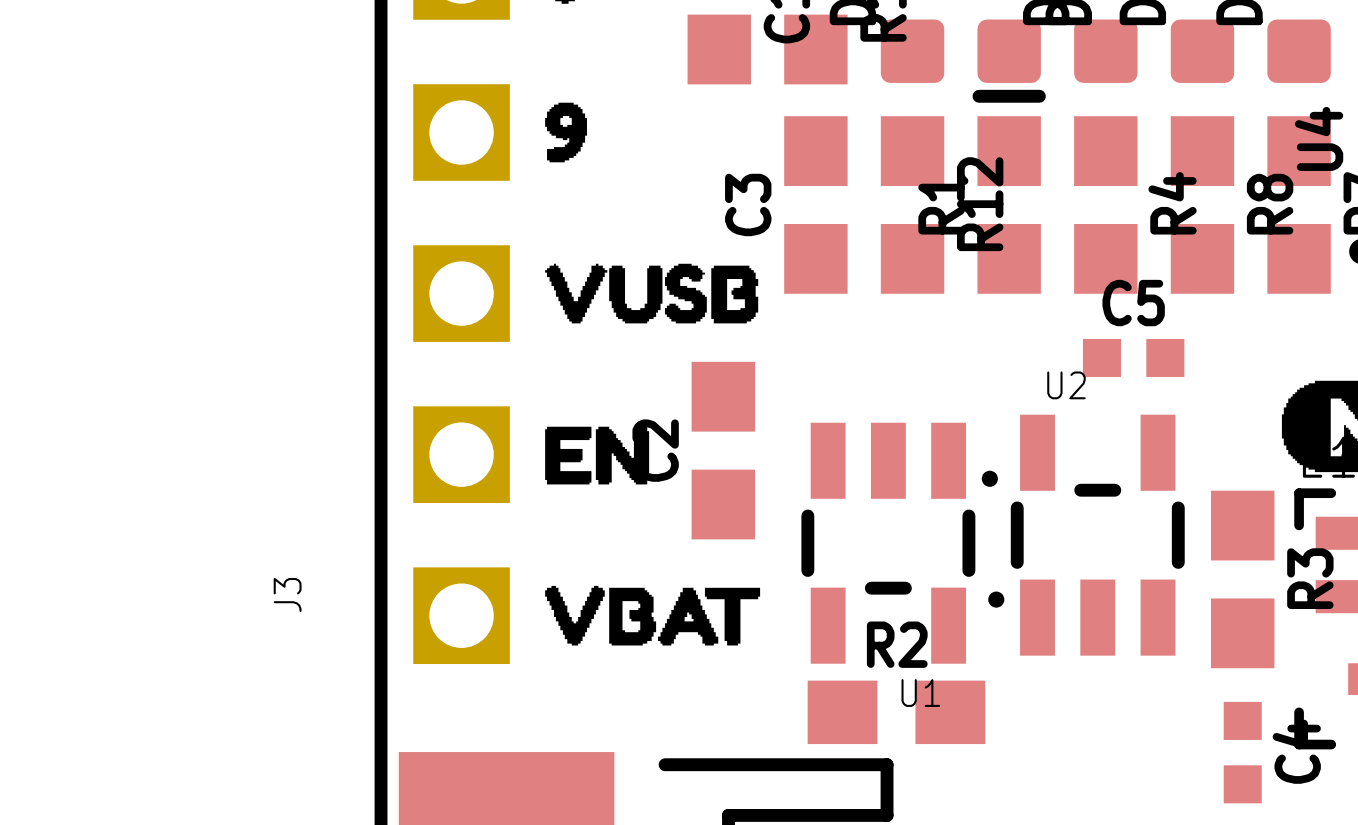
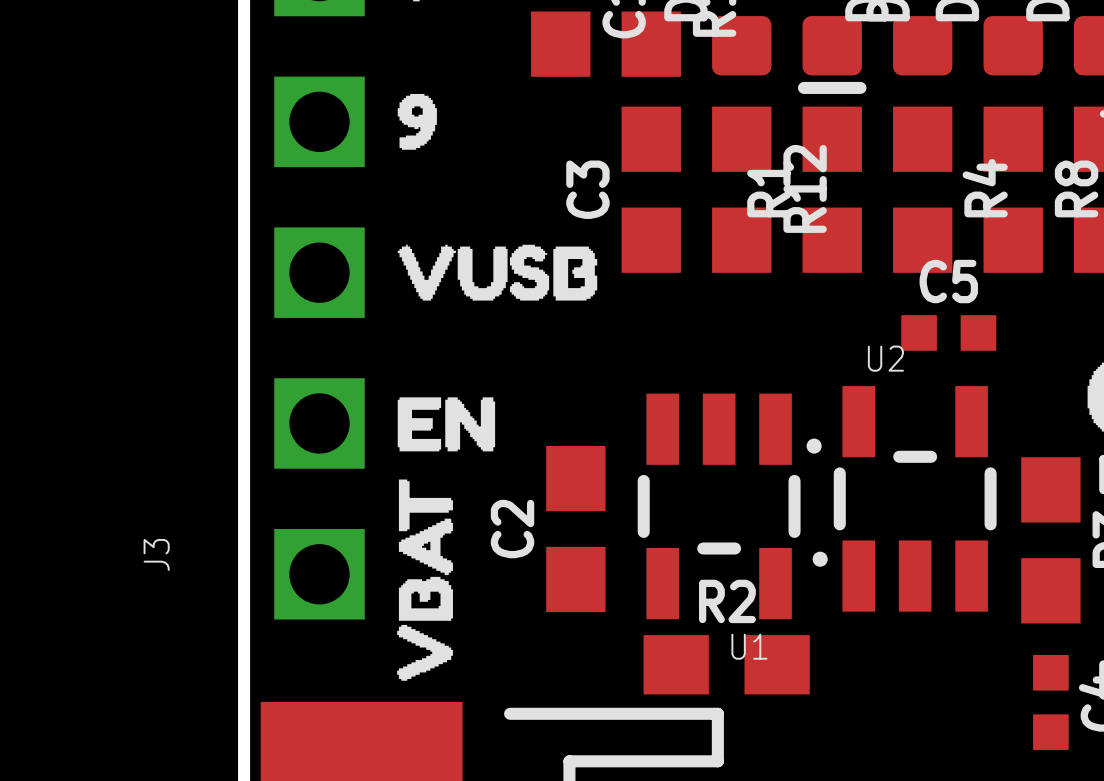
C2 position: (723, 450) -> (575, 529)
drawing: none -> [397, 479, 453, 681]
drawing: [545, 585, 761, 646] -> none

